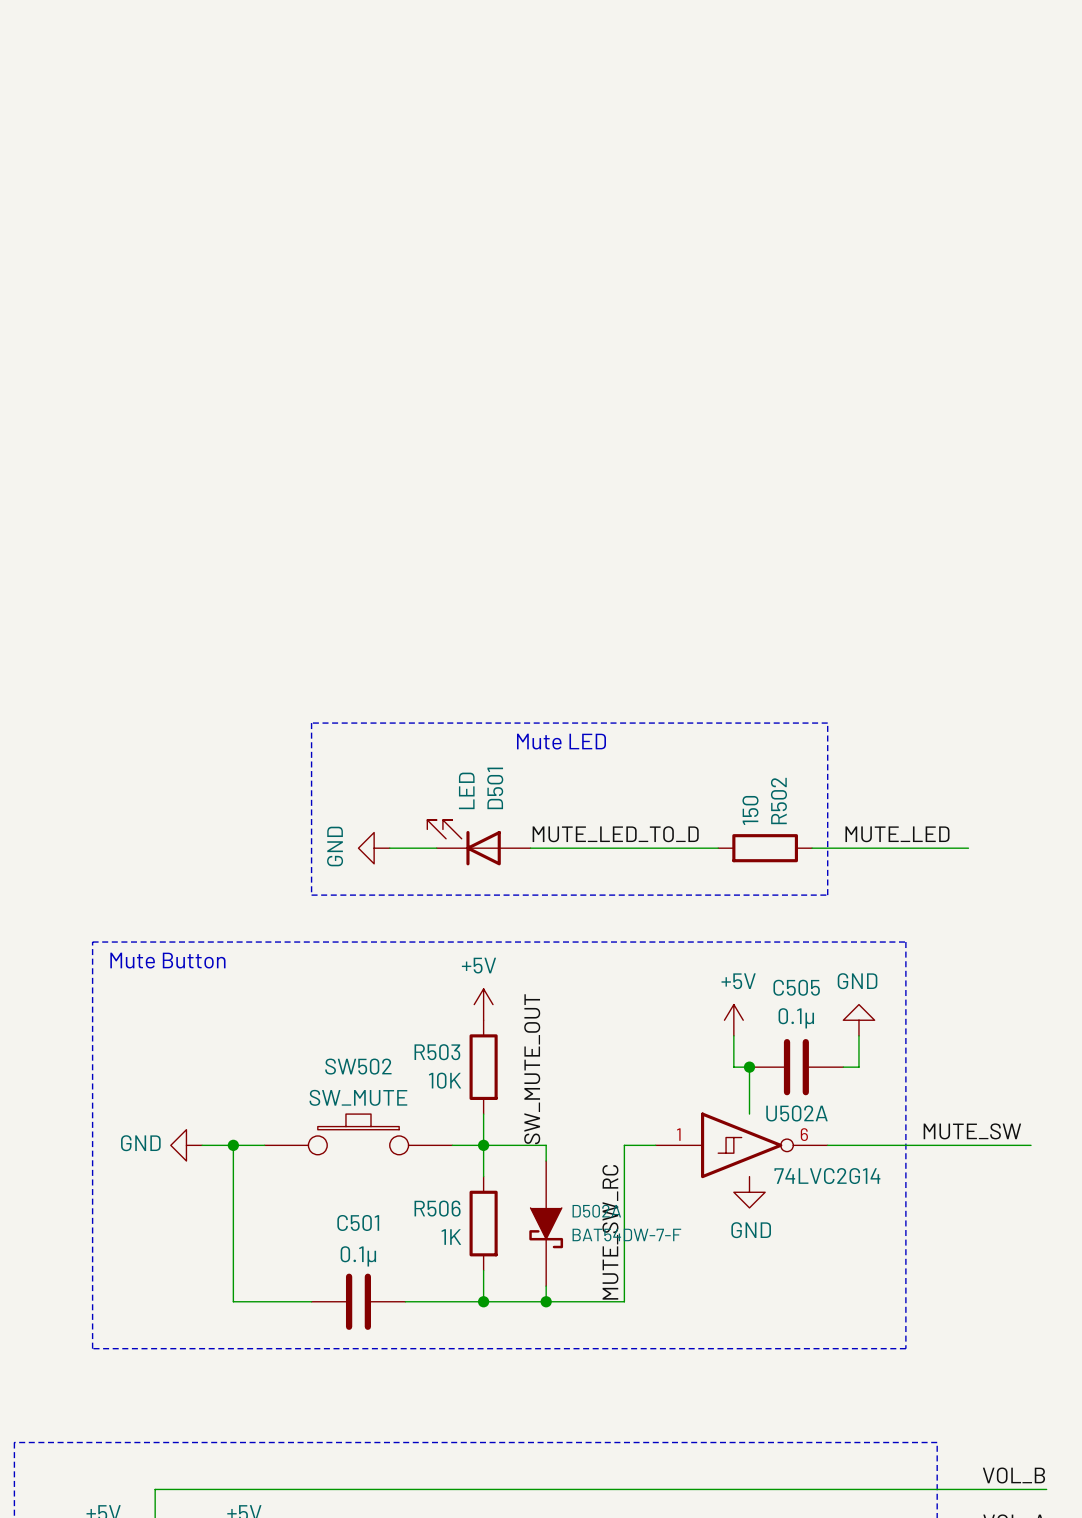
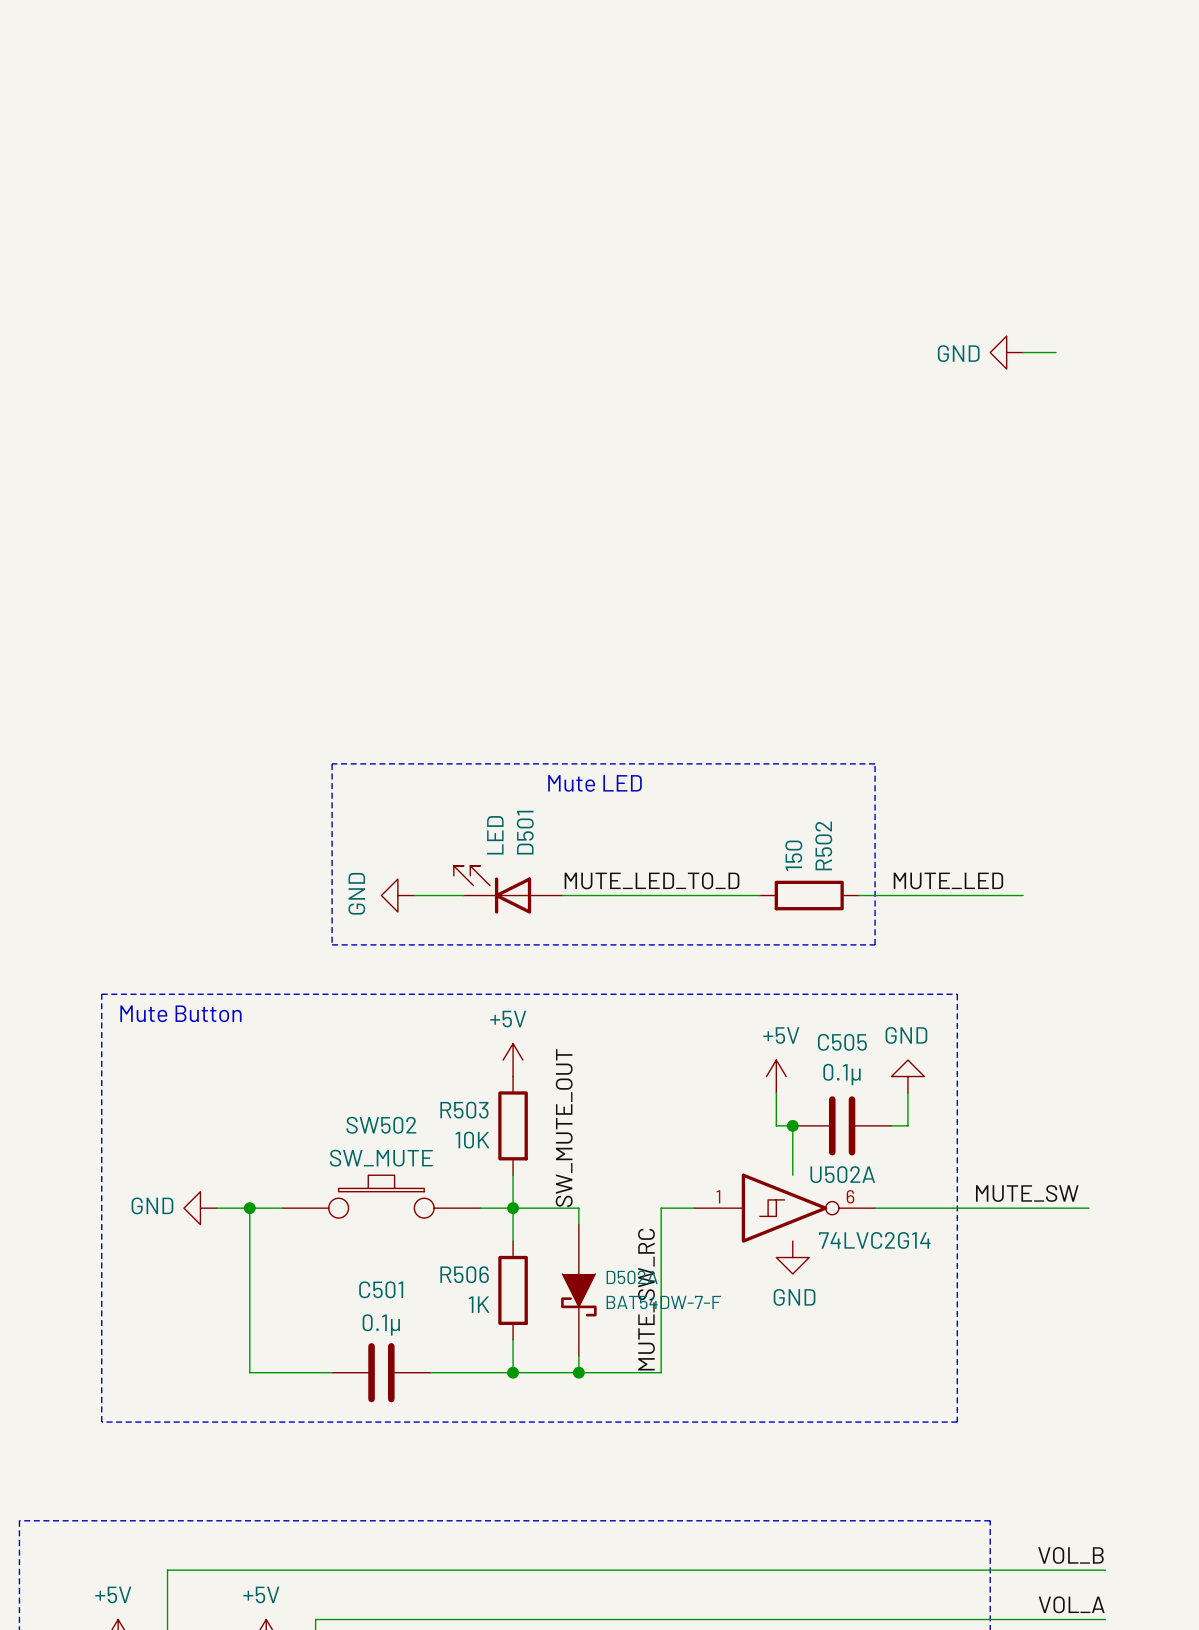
power symbol: none -> GND (1006, 352)
wire: none -> (1023, 352) (1056, 352)

